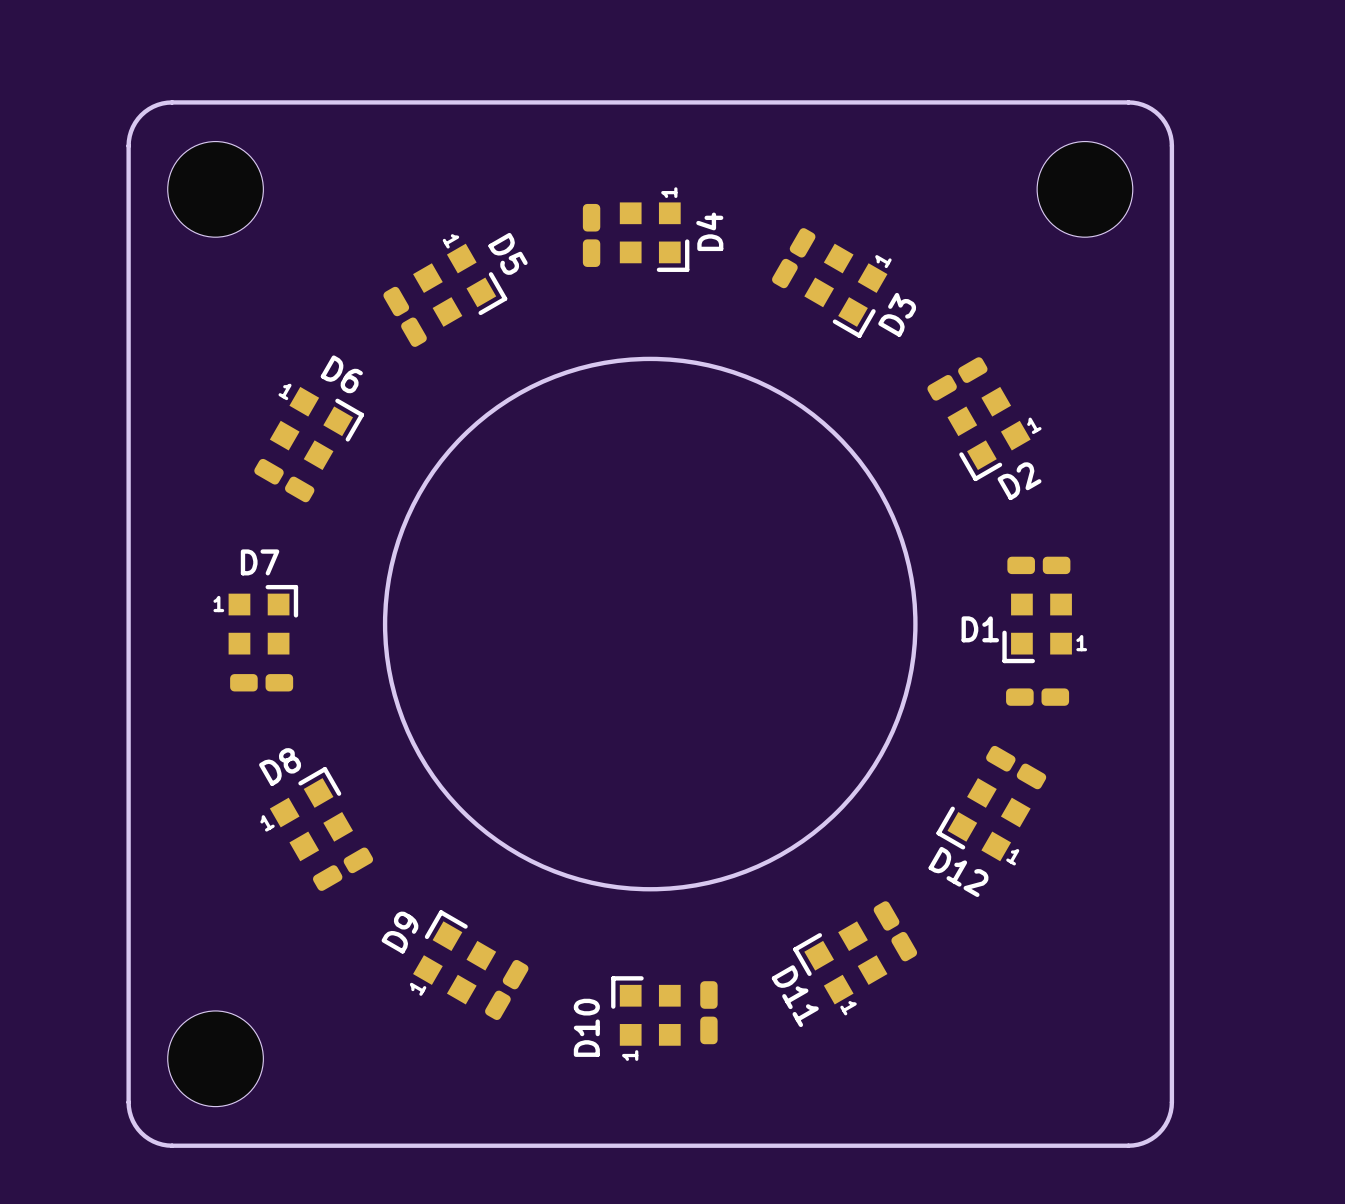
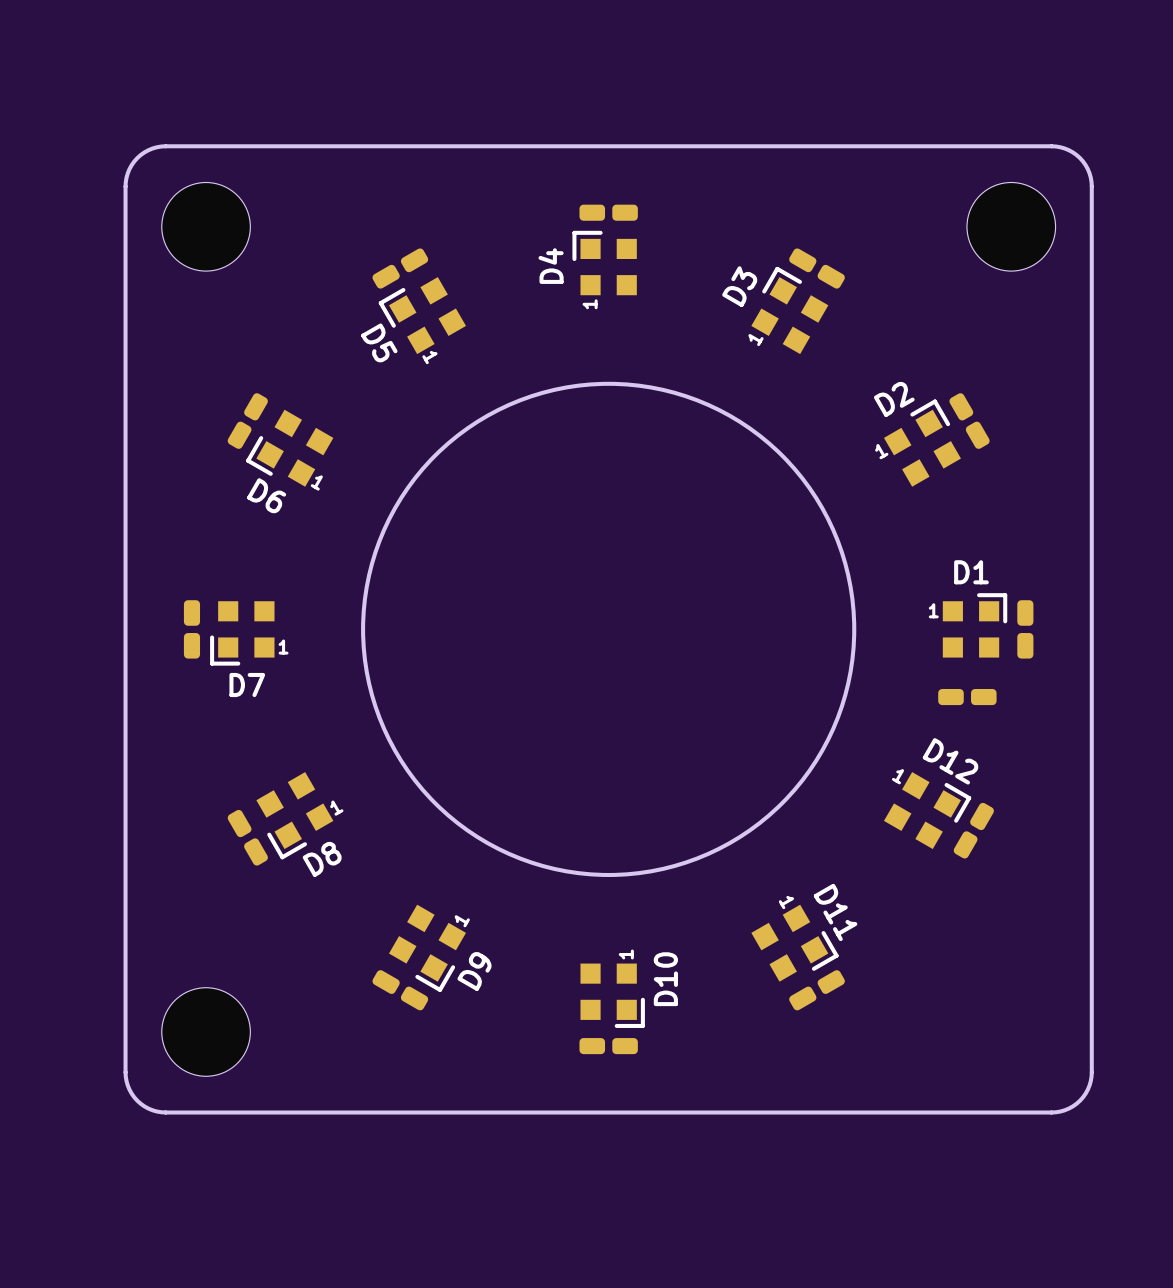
part rotation: 0° (591, 235) -> 90° clockwise (608, 212)
part position: (591, 235) -> (608, 212)
D4 rotation: 0° (654, 237) -> 180° (604, 263)
part rotation: 0° (793, 258) -> 90° clockwise (817, 268)
part position: (793, 258) -> (817, 268)
D5 rotation: 0° (460, 285) -> 180° (422, 315)
D3 rotation: 0° (845, 290) -> 180° (789, 310)
part rotation: 0° (405, 316) -> 90° clockwise (400, 268)
part position: (405, 316) -> (400, 268)
part rotation: 0° (957, 378) -> 90° clockwise (969, 421)
part position: (957, 378) -> (969, 421)
D6 rotation: 0° (316, 428) -> 180° (289, 448)
D2 rotation: 0° (989, 434) -> 180° (922, 443)
part rotation: 0° (284, 480) -> 90° clockwise (247, 421)
part position: (284, 480) -> (247, 421)
part rotation: 0° (1038, 565) -> 90° clockwise (1025, 629)
part position: (1038, 565) -> (1025, 629)
D7 rotation: 0° (263, 619) -> 180° (242, 633)
D1 rotation: 0° (1037, 628) -> 180° (975, 625)
part rotation: 0° (261, 682) -> 90° clockwise (191, 629)
part position: (261, 682) -> (191, 629)
part rotation: 0° (1016, 767) -> 90° clockwise (973, 830)
part position: (1016, 767) -> (973, 830)
D8 rotation: 0° (311, 814) -> 180° (294, 815)
D12 rotation: 0° (983, 819) -> 180° (927, 810)
part rotation: 0° (343, 869) -> 90° clockwise (247, 837)
part position: (343, 869) -> (247, 837)
part rotation: 0° (895, 931) -> 90° clockwise (817, 990)
part position: (895, 931) -> (817, 990)
D9 rotation: 0° (454, 957) -> 180° (427, 948)
D11 rotation: 0° (840, 962) -> 180° (794, 943)
part rotation: 0° (506, 989) -> 90° clockwise (400, 990)
part position: (506, 989) -> (400, 990)
D10 rotation: 0° (645, 1010) -> 180° (612, 995)
part rotation: 0° (708, 1012) -> 90° clockwise (608, 1046)
part position: (708, 1012) -> (608, 1046)

